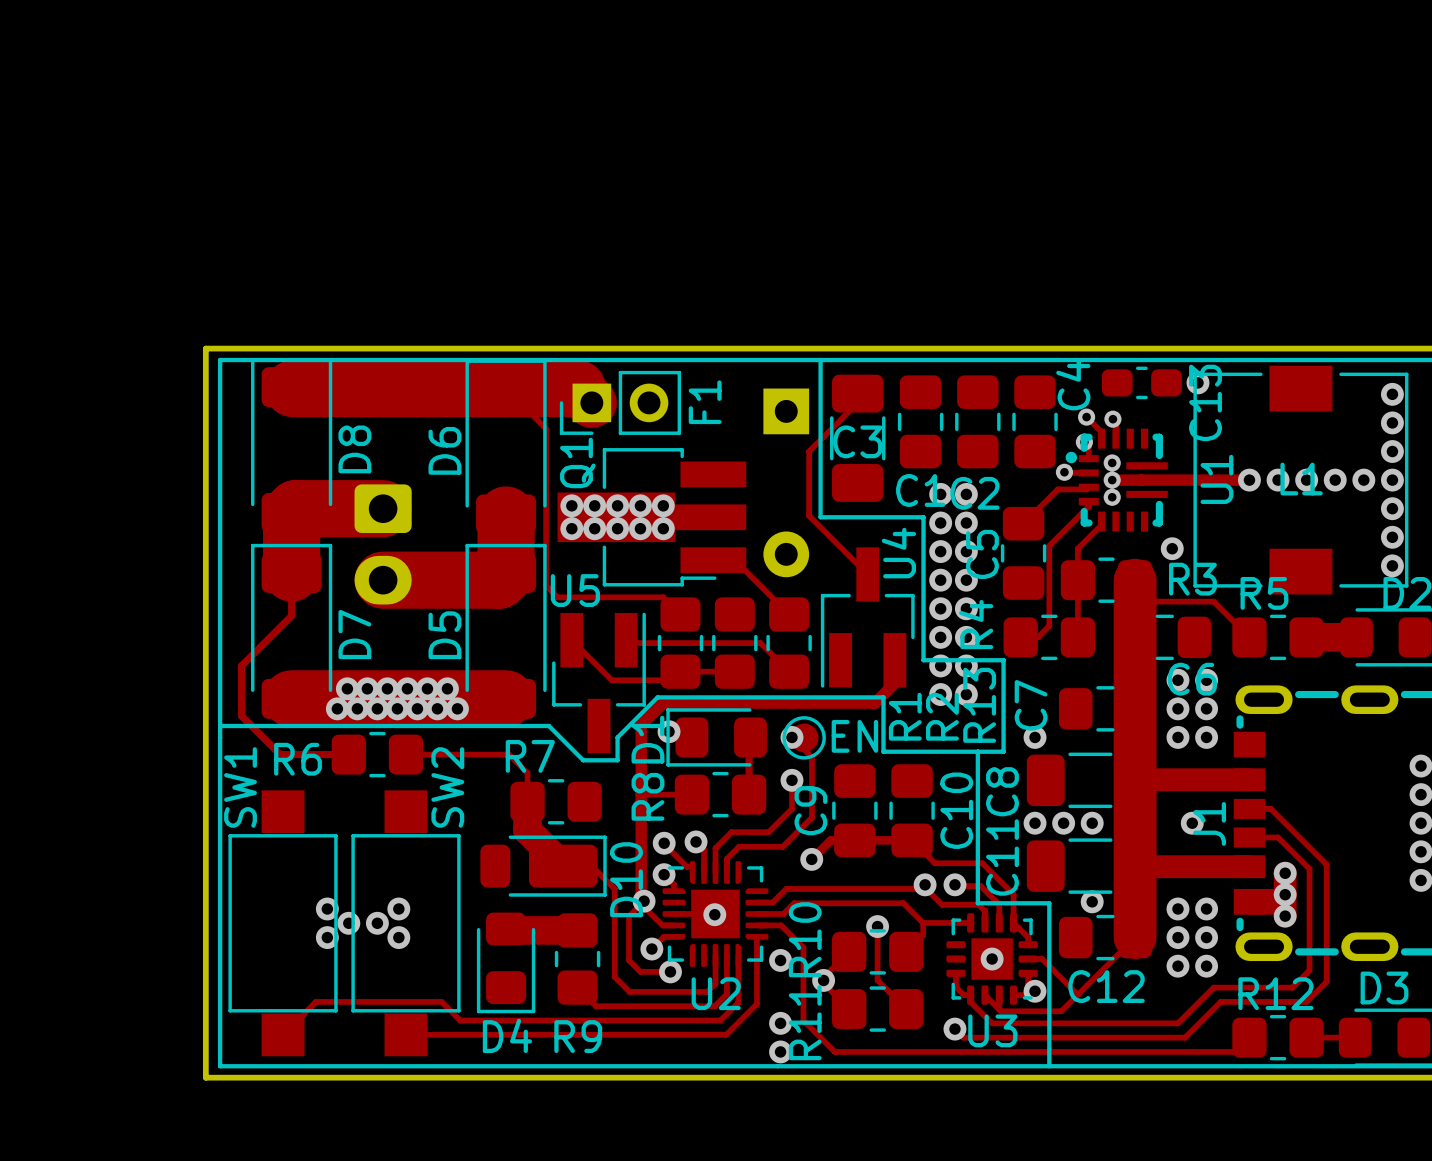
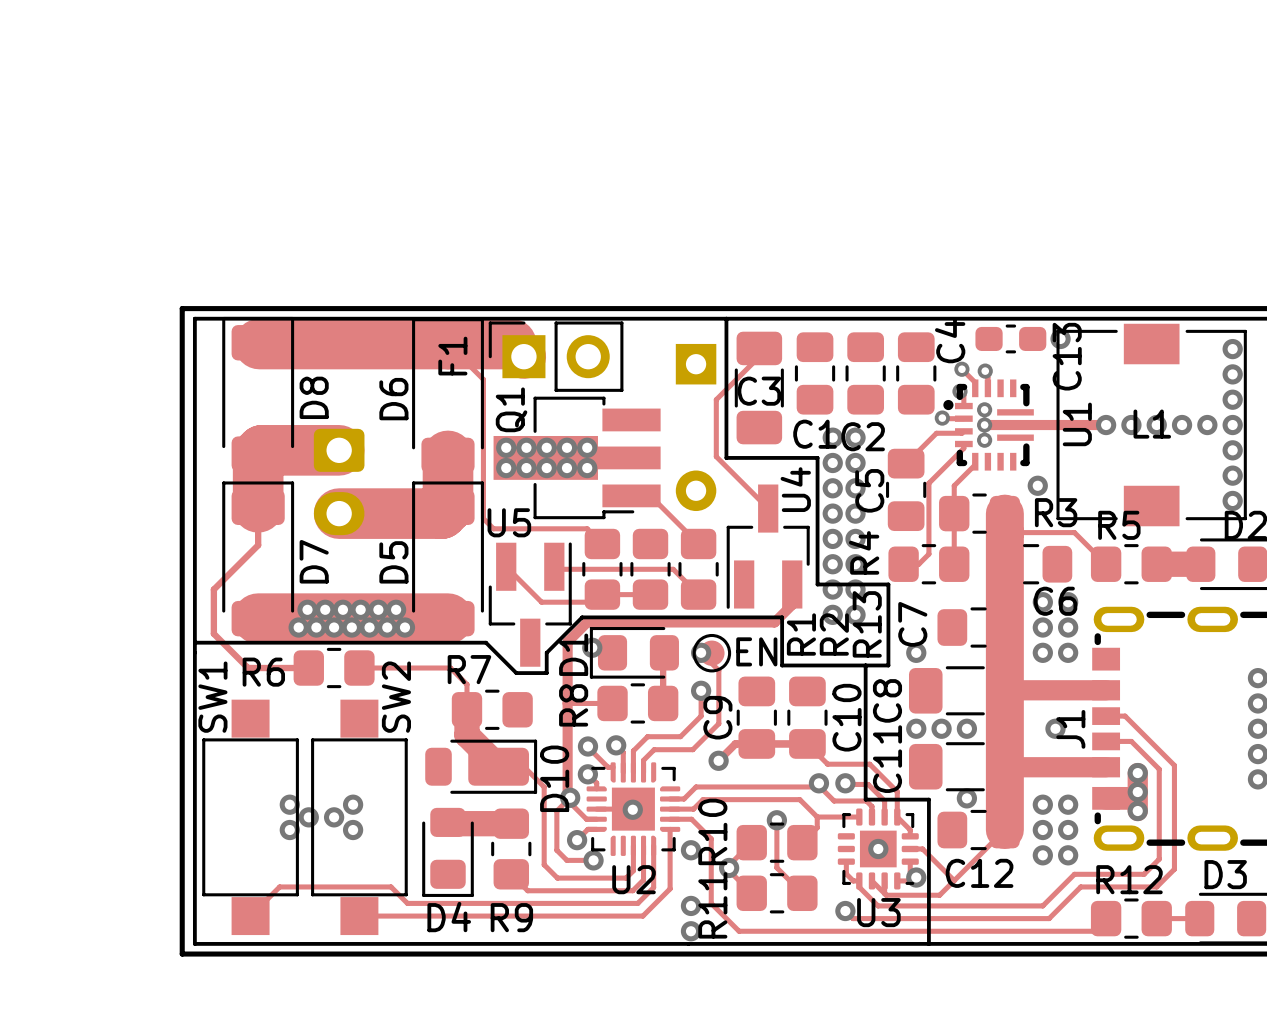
F1 footprint: [559, 370, 682, 435] -> [488, 321, 624, 392]
F1 name position: F1 (705, 402) -> F1 (452, 356)

